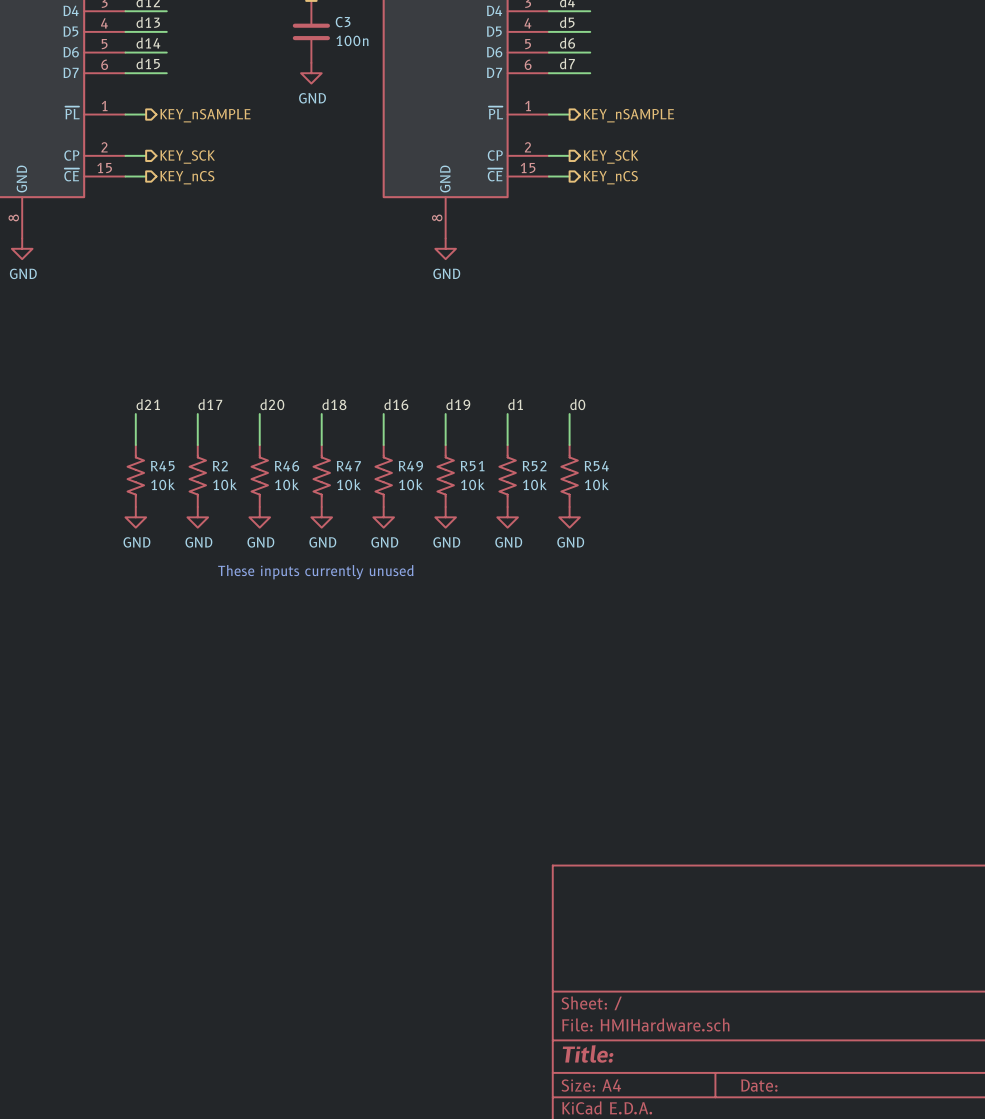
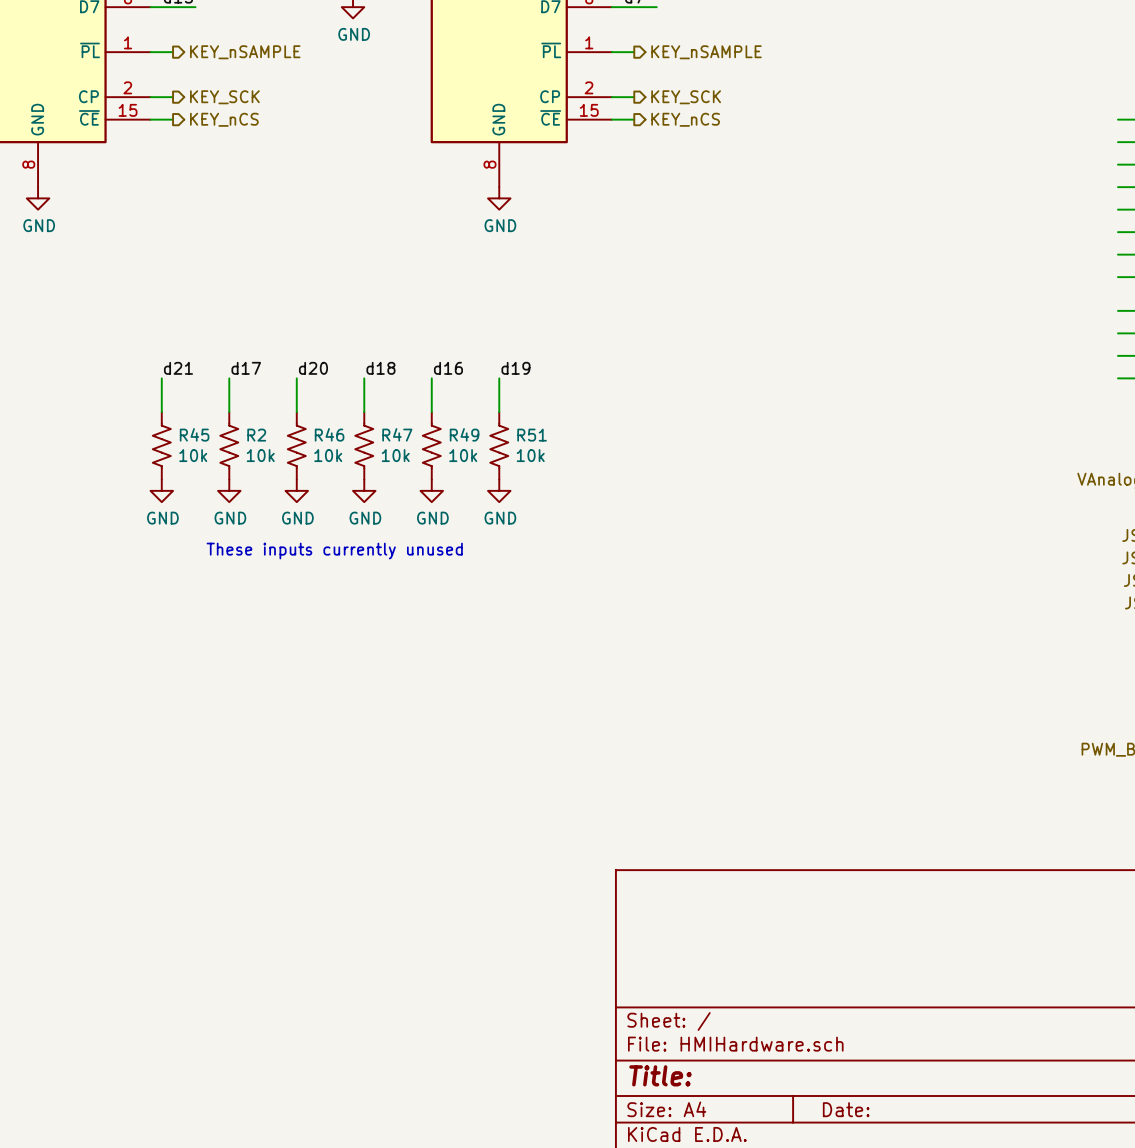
label: d1 (515, 404) -> none
label: d0 (577, 404) -> none
wire: (507, 414) (507, 445) -> none
wire: (569, 414) (569, 445) -> none
R52: 10k (507, 476) -> none
R54: 10k (569, 476) -> none
power symbol: GND (507, 517) -> none
power symbol: GND (569, 517) -> none

